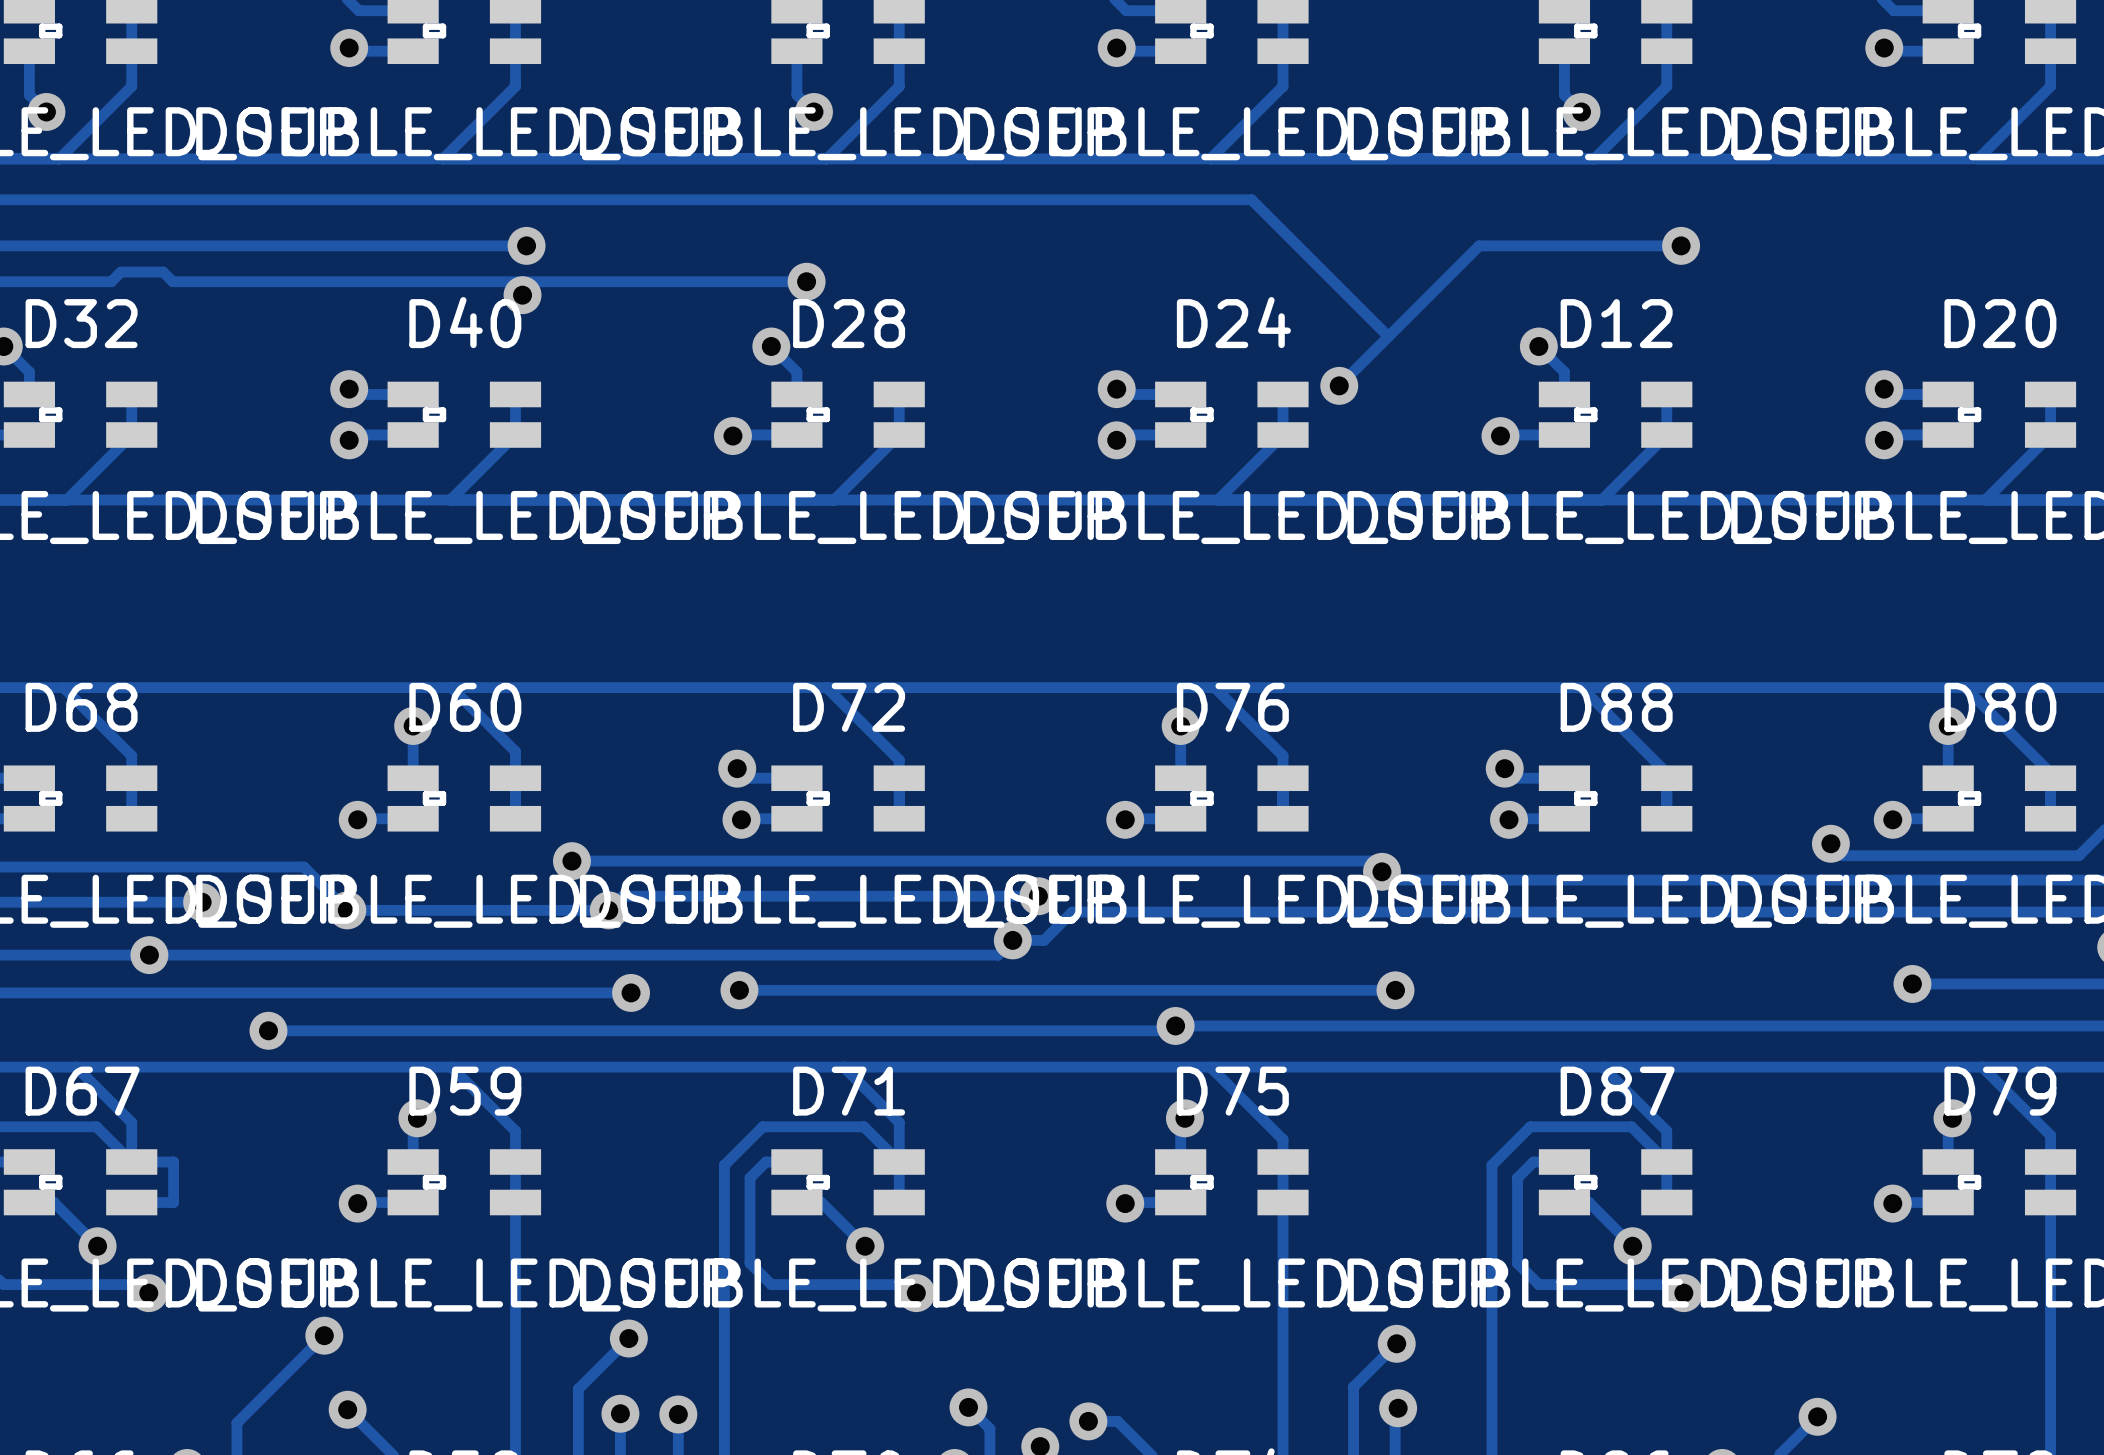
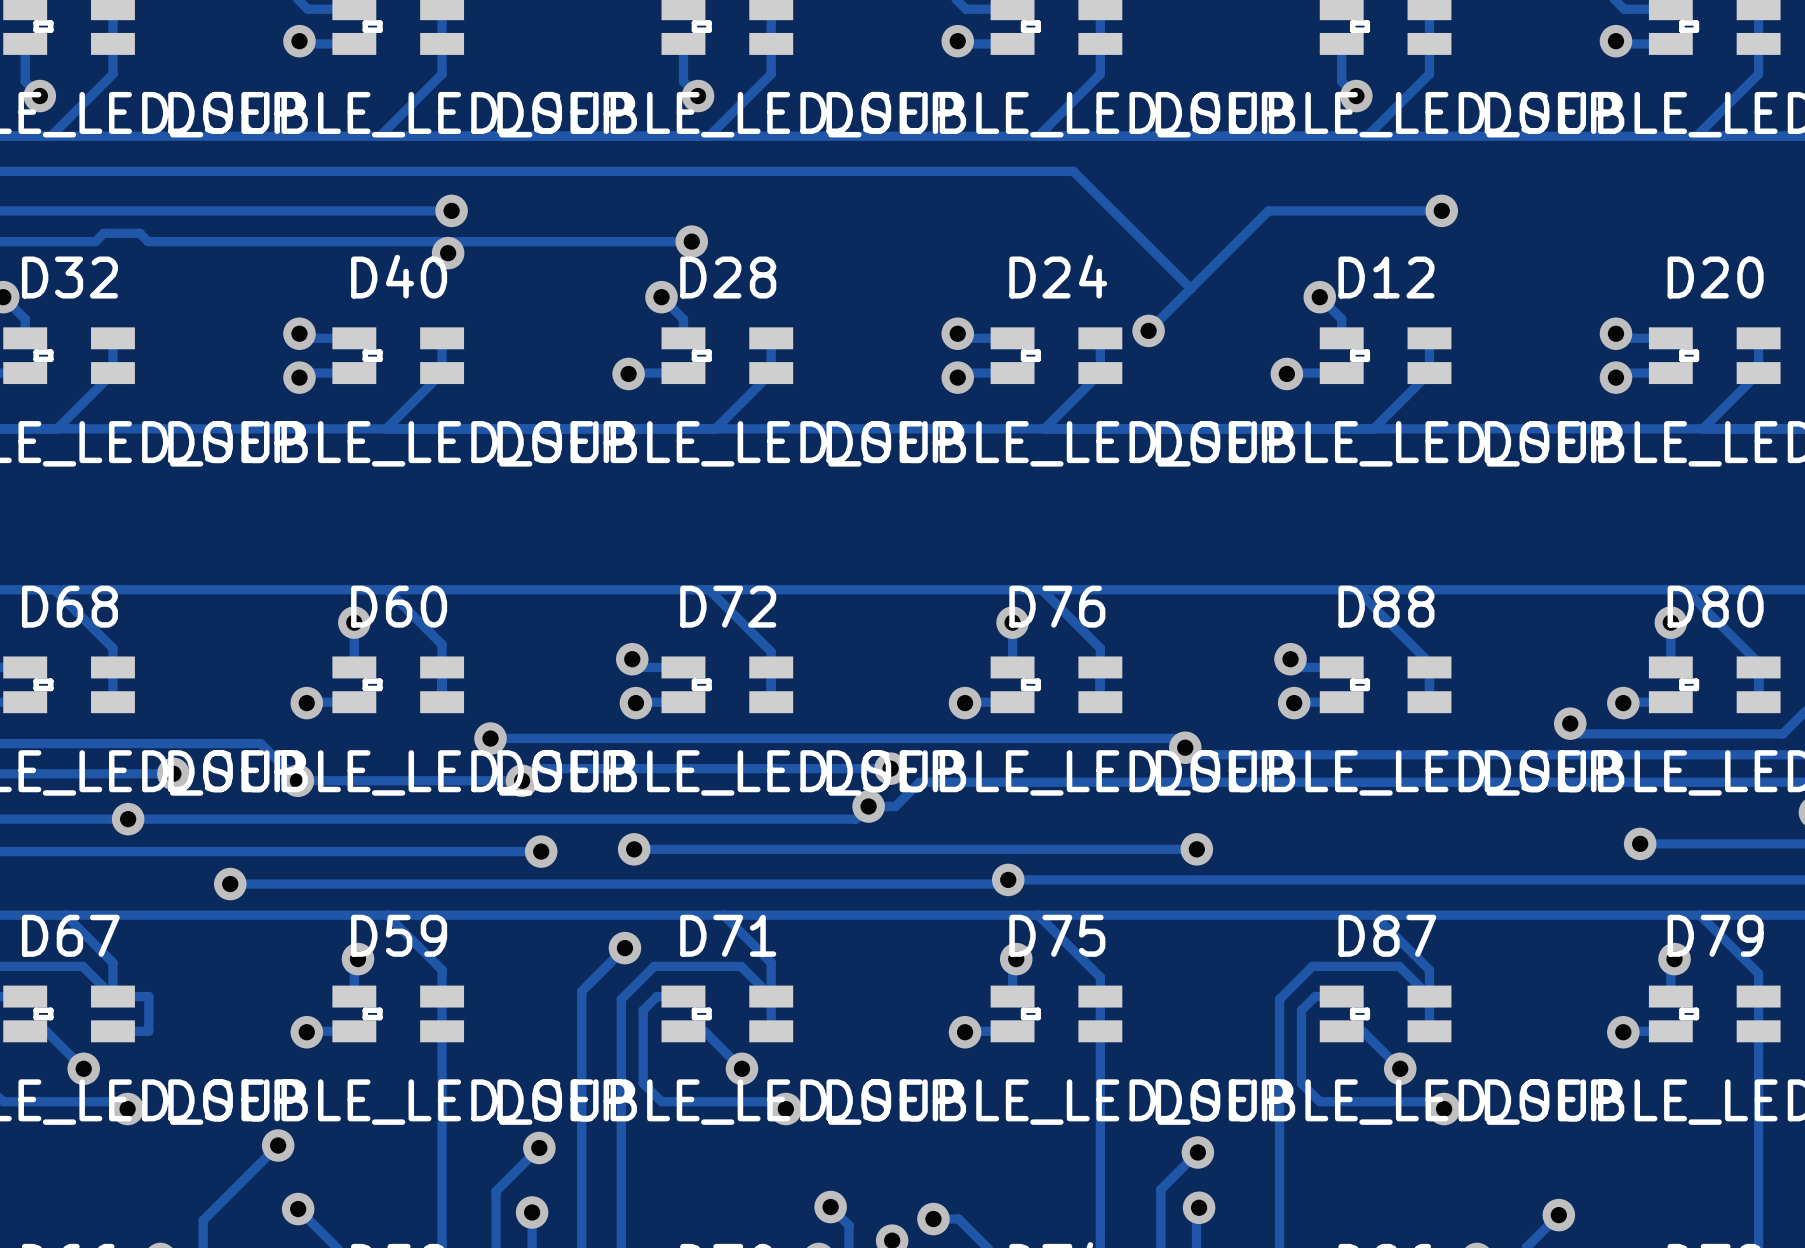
track: none -> (624, 948) (581, 991) (581, 1213)
via: none -> (624, 948)
via: (678, 1414) -> none

